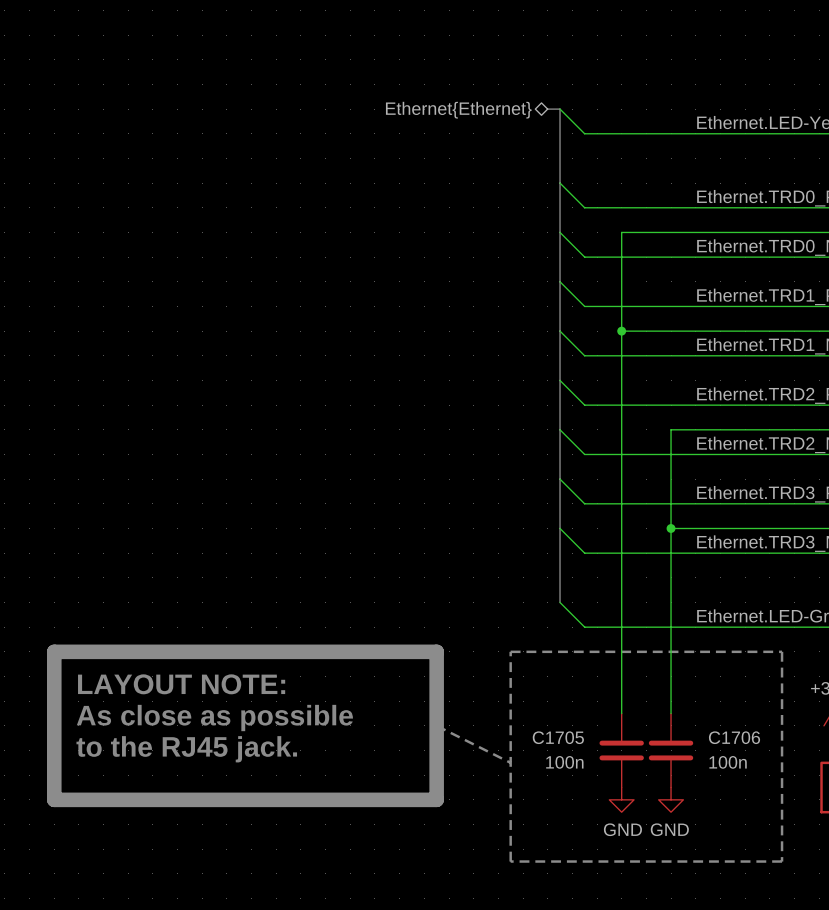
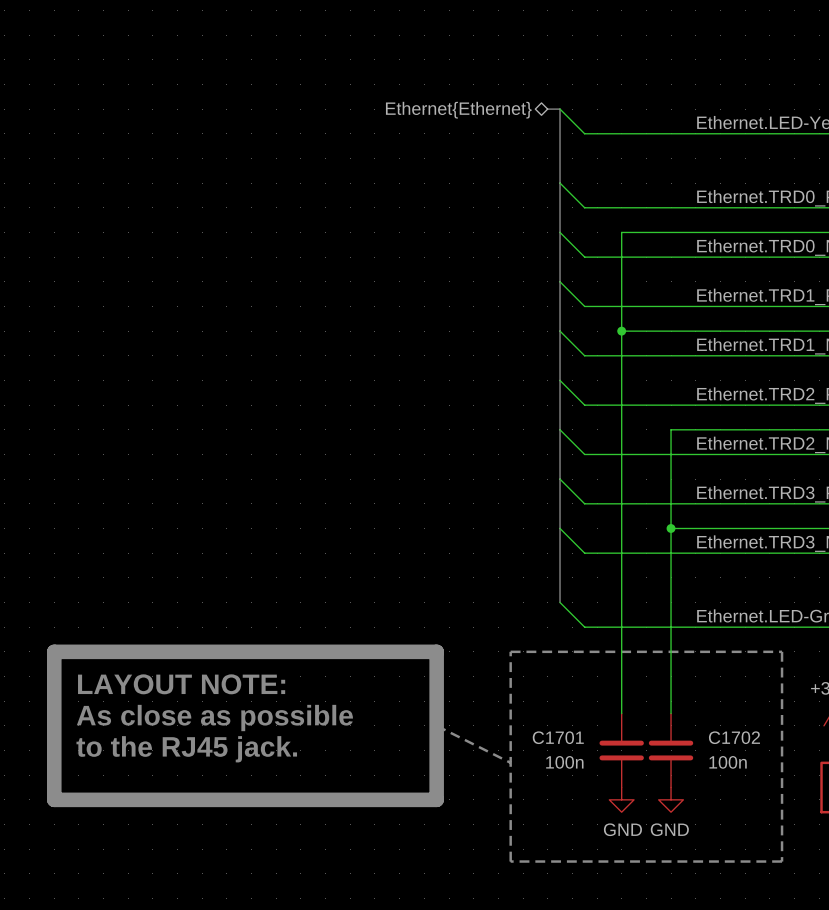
C1705 name: C1705 (558, 737) -> C1701 (558, 737)
C1706 name: C1706 (734, 737) -> C1702 (734, 737)

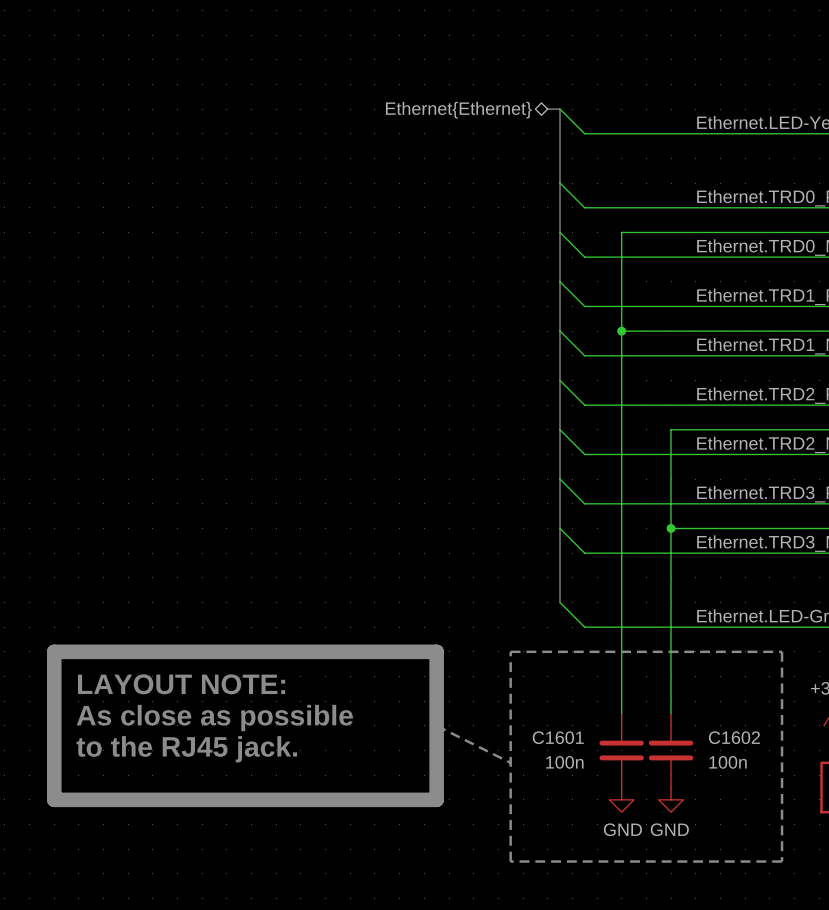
C1701 name: C1701 (558, 737) -> C1601 (558, 737)
C1702 name: C1702 (734, 737) -> C1602 (734, 737)

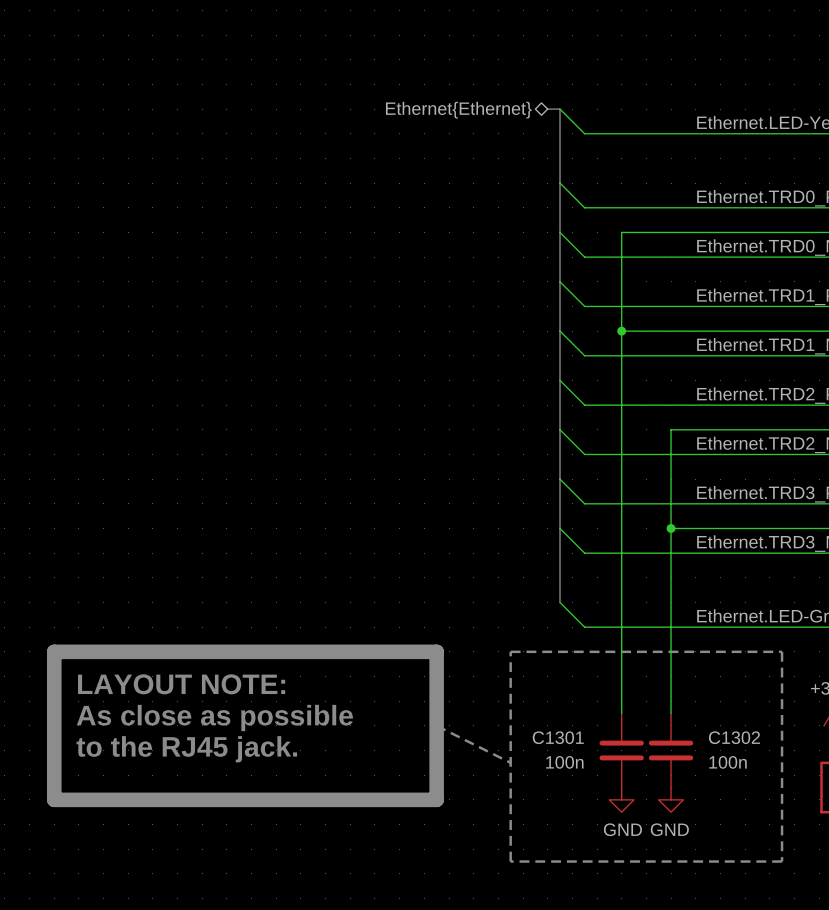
C1601 name: C1601 (558, 737) -> C1301 (558, 737)
C1602 name: C1602 (734, 737) -> C1302 (734, 737)

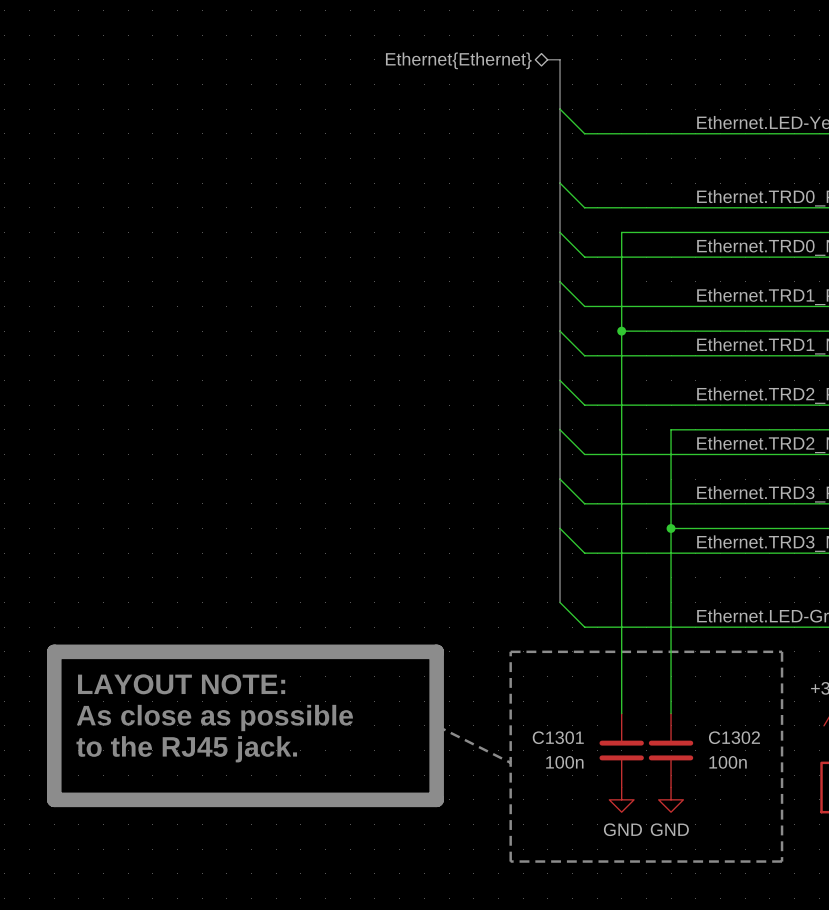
bus: (547, 109) (560, 109) -> (547, 59) (560, 59) (560, 109)
hierarchical label position: Ethernet{Ethernet} (458, 110) -> Ethernet{Ethernet} (458, 60)

